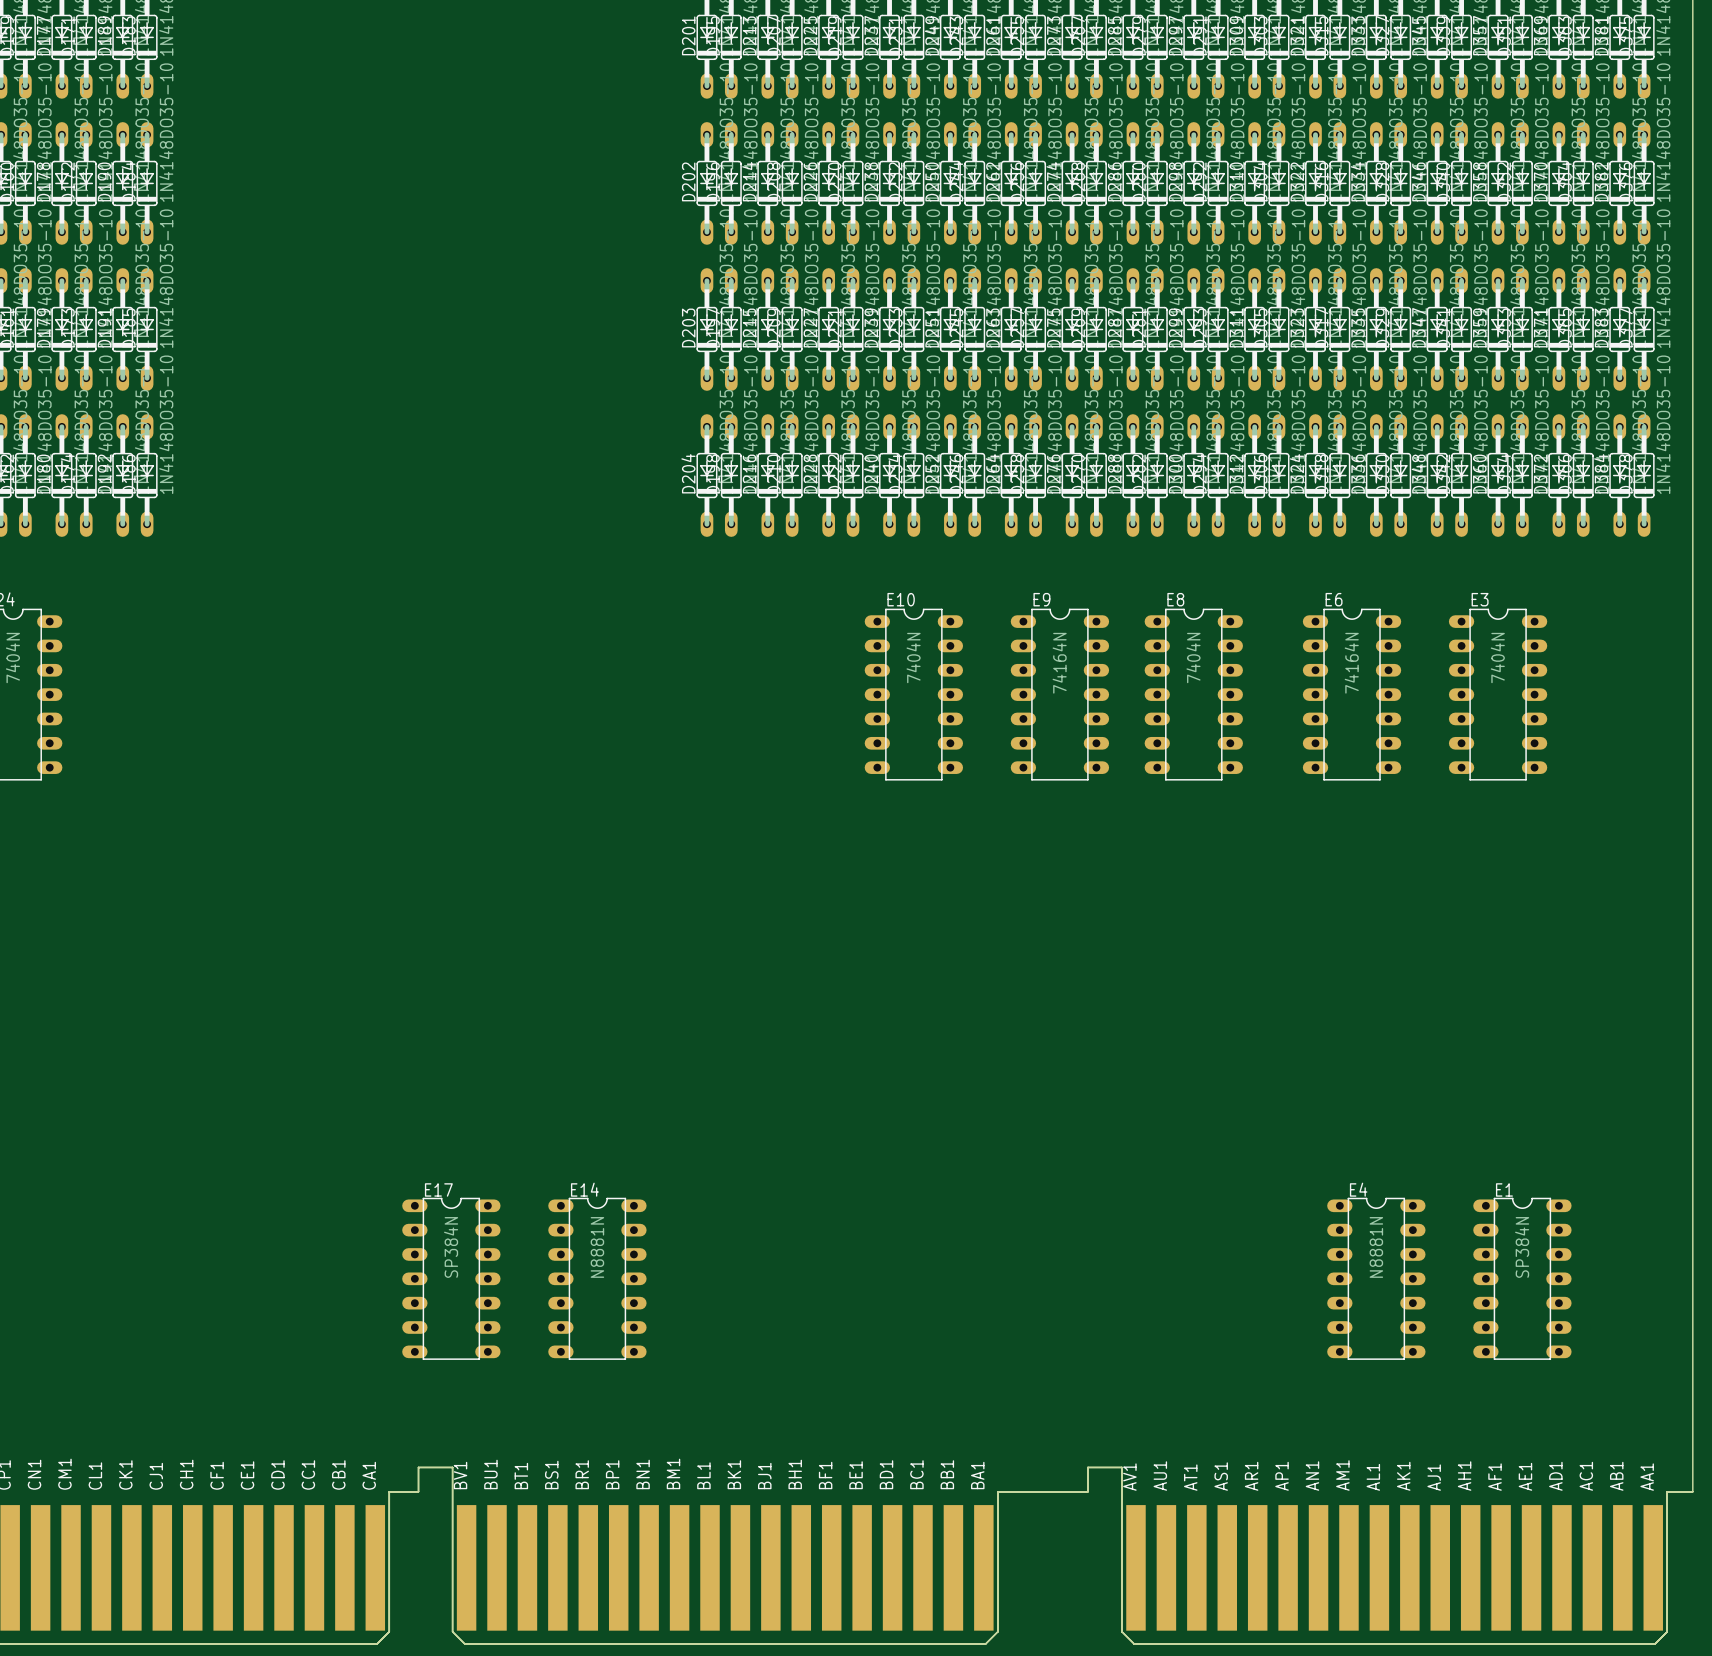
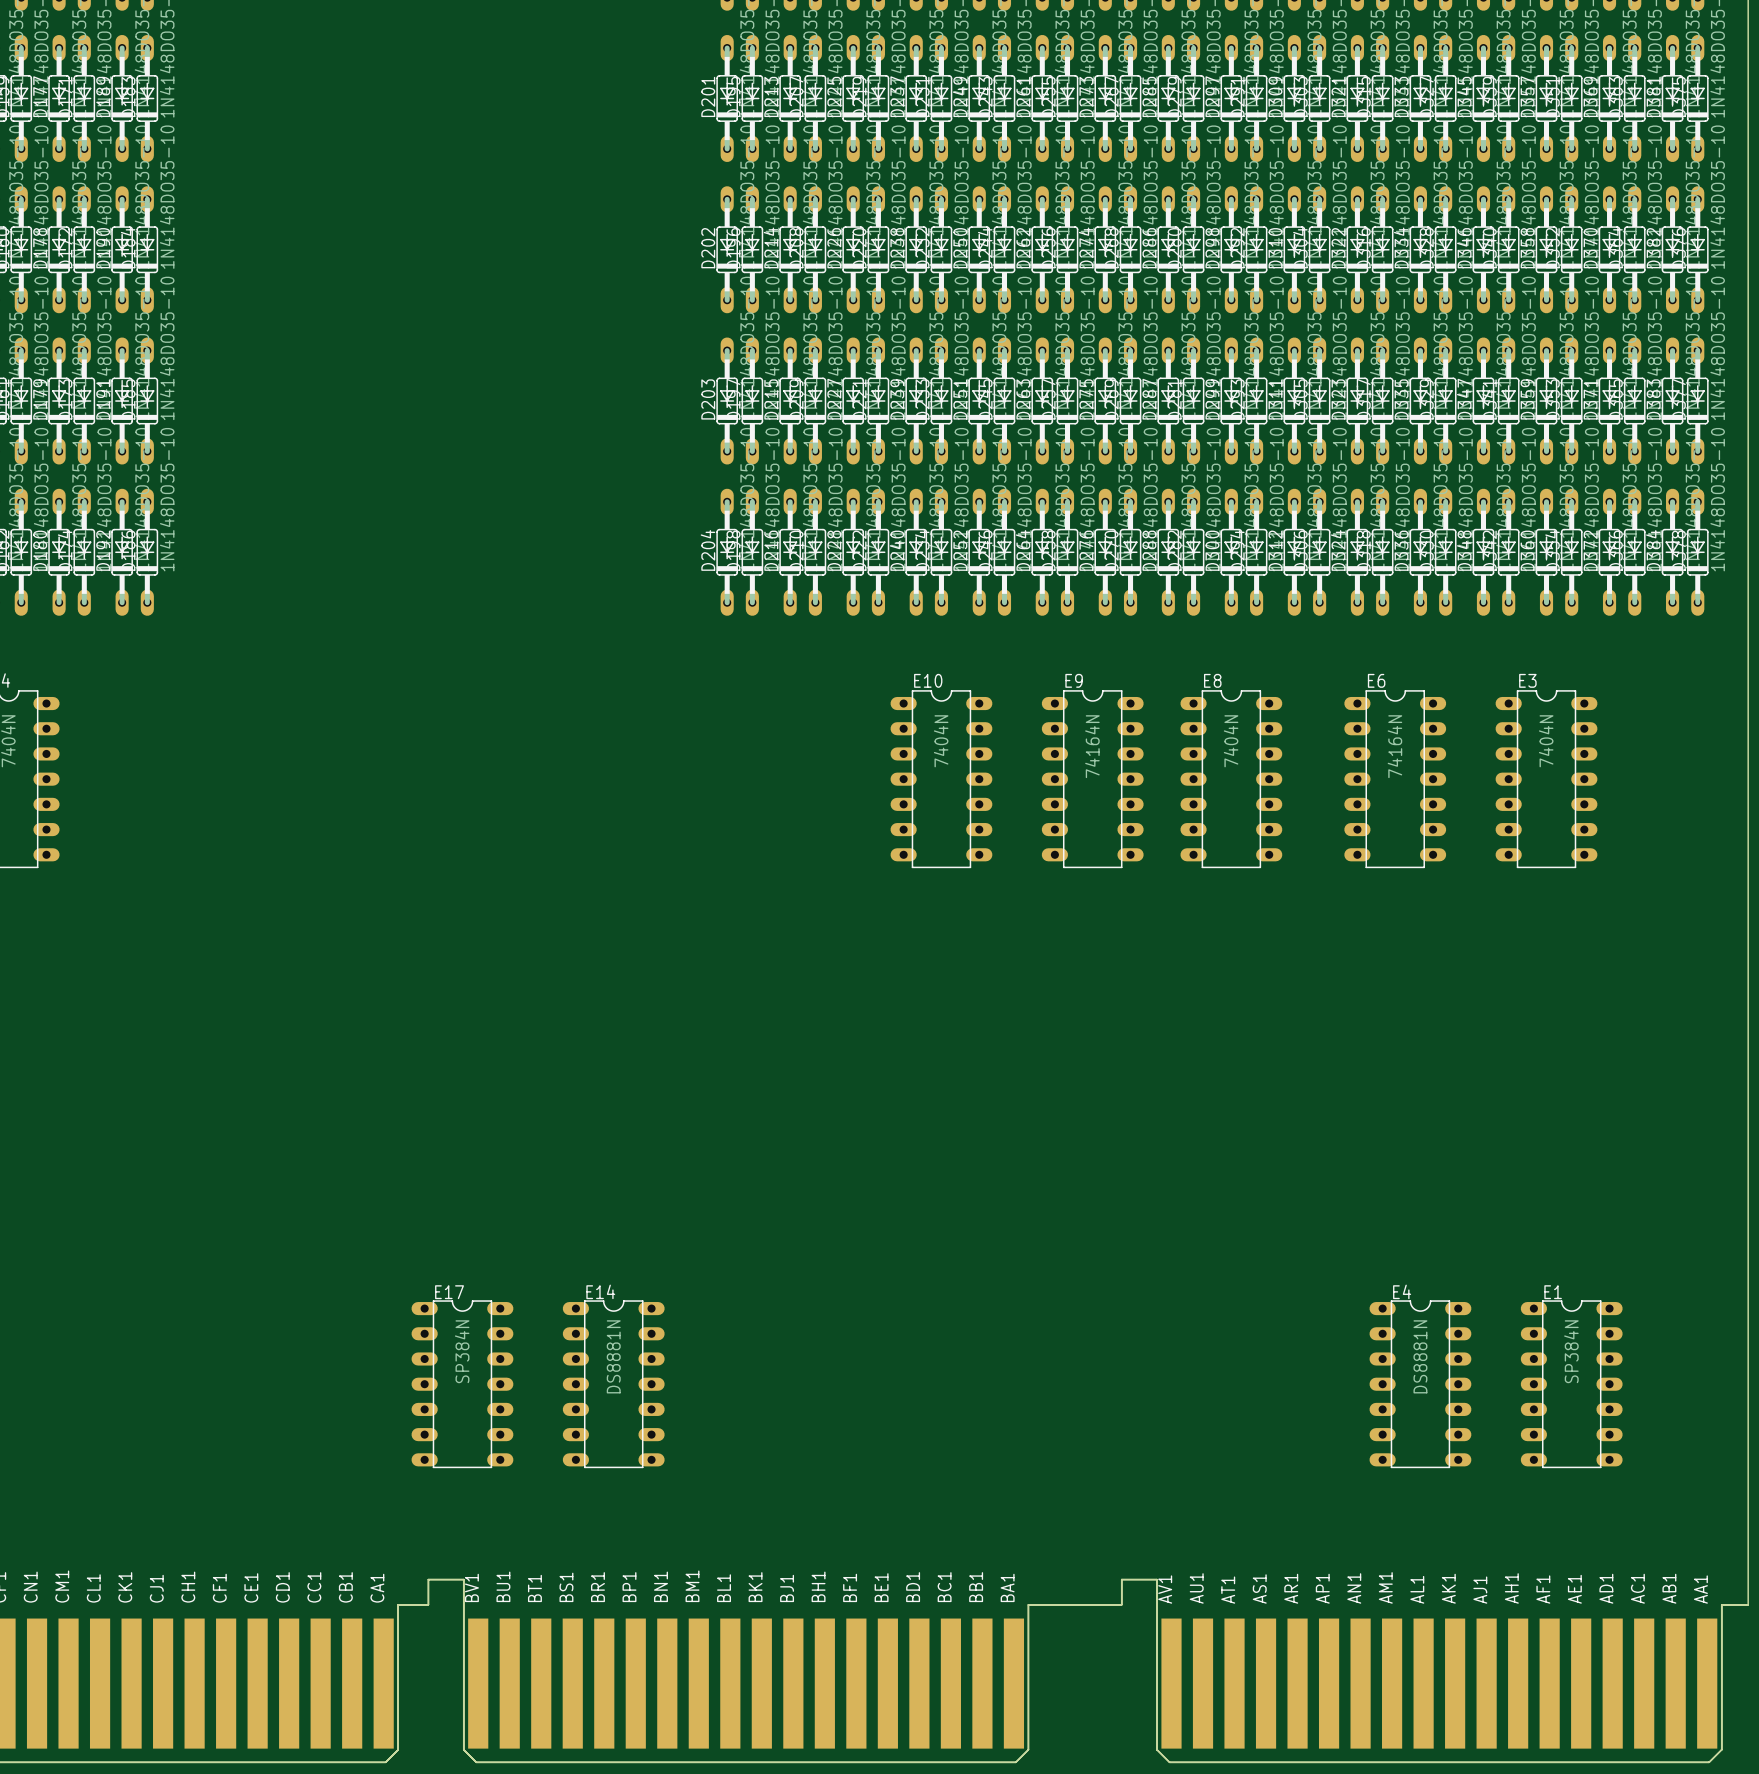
E14 value: N8881N (597, 1247) -> DS8881N (613, 1356)
E4 value: N8881N (1376, 1247) -> DS8881N (1420, 1356)

